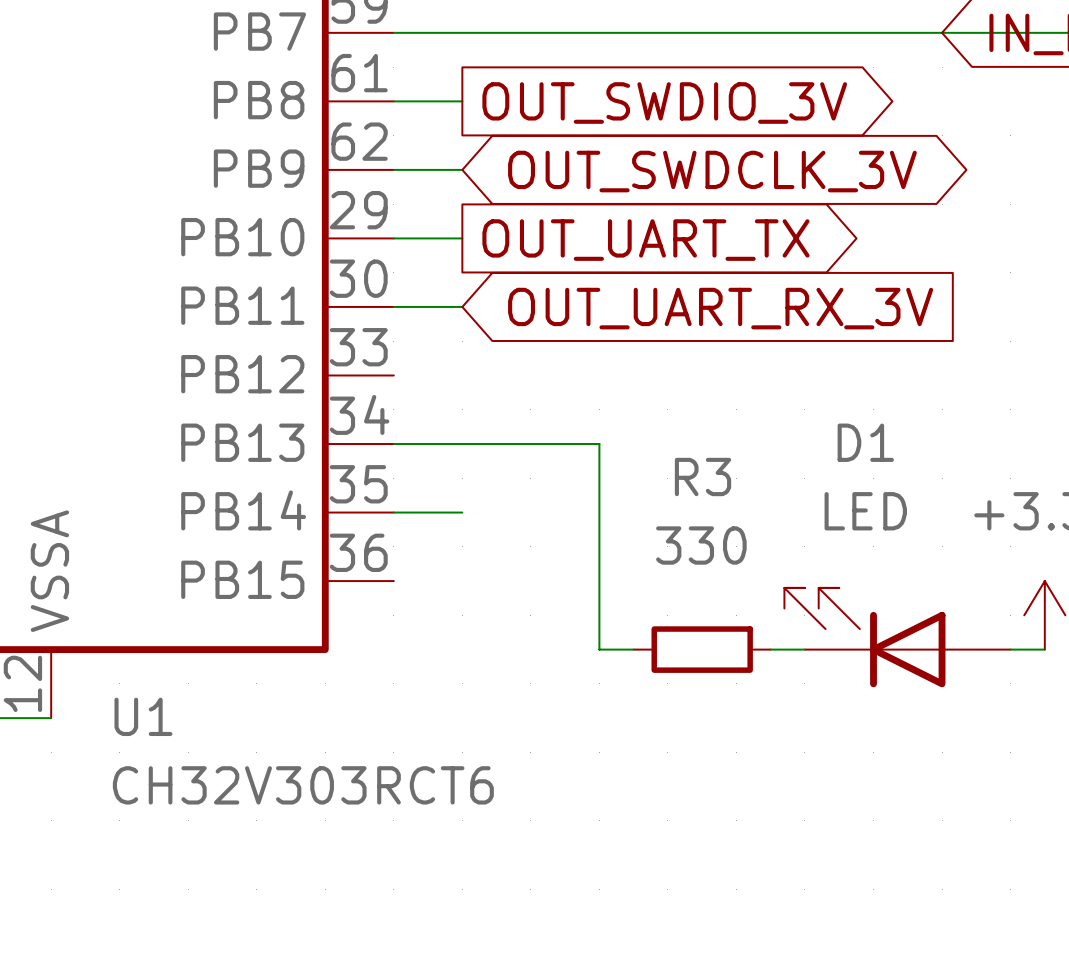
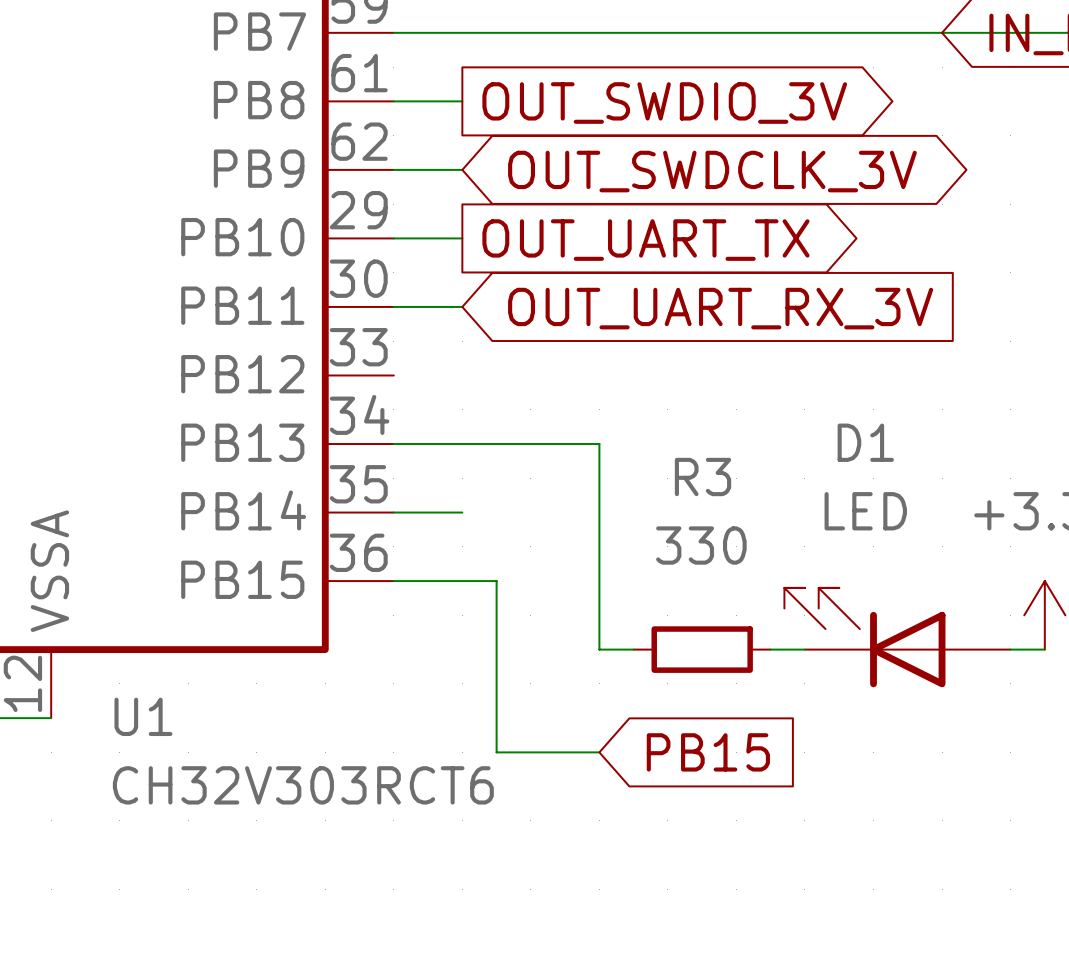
wire: none -> (393, 581) (496, 581) (496, 752) (599, 752)
global label: none -> PB15 (708, 752)

